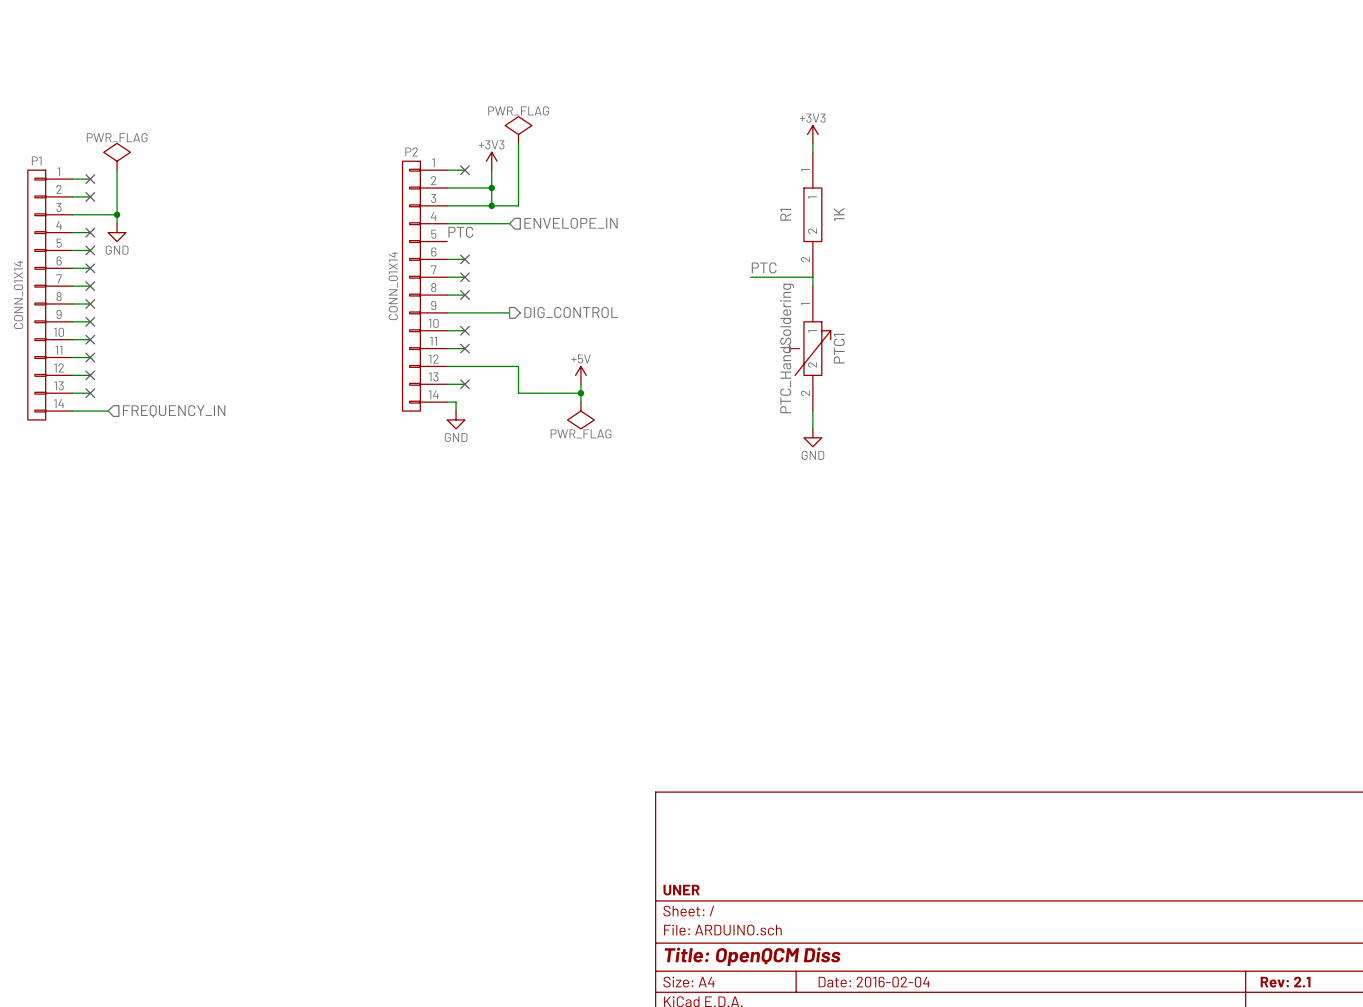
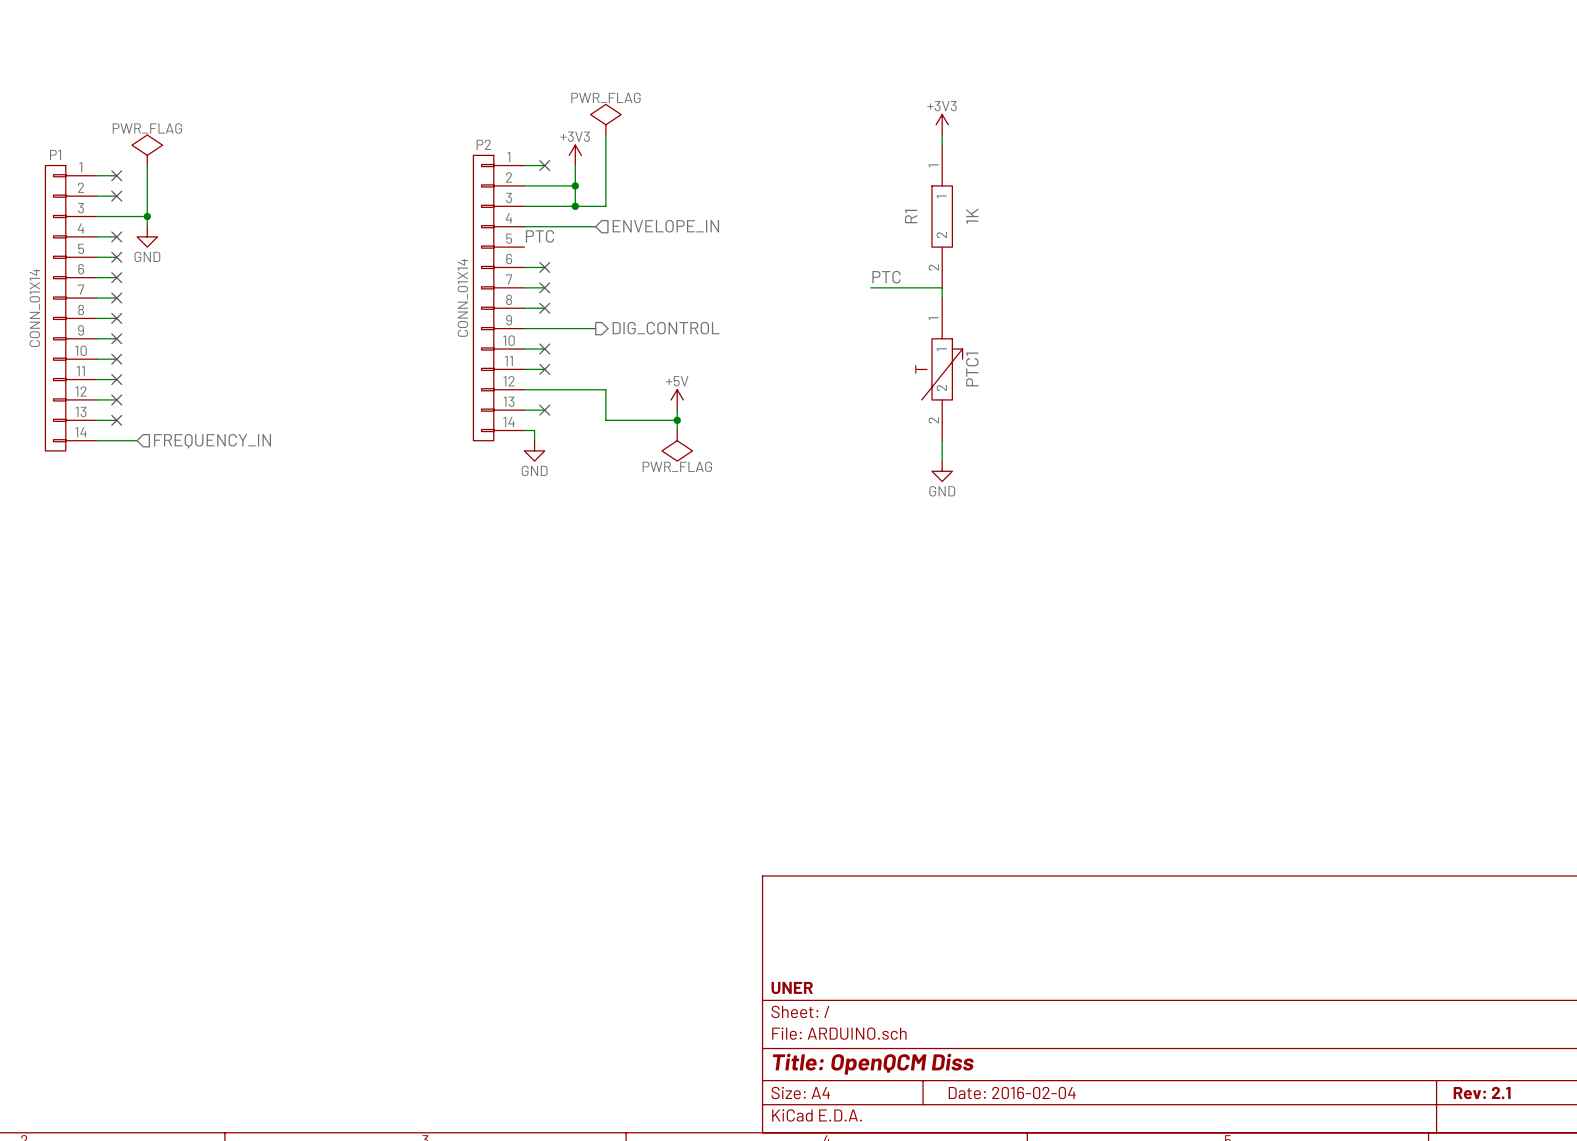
PTC1 value: PTC_HandSoldering (787, 348) -> none

